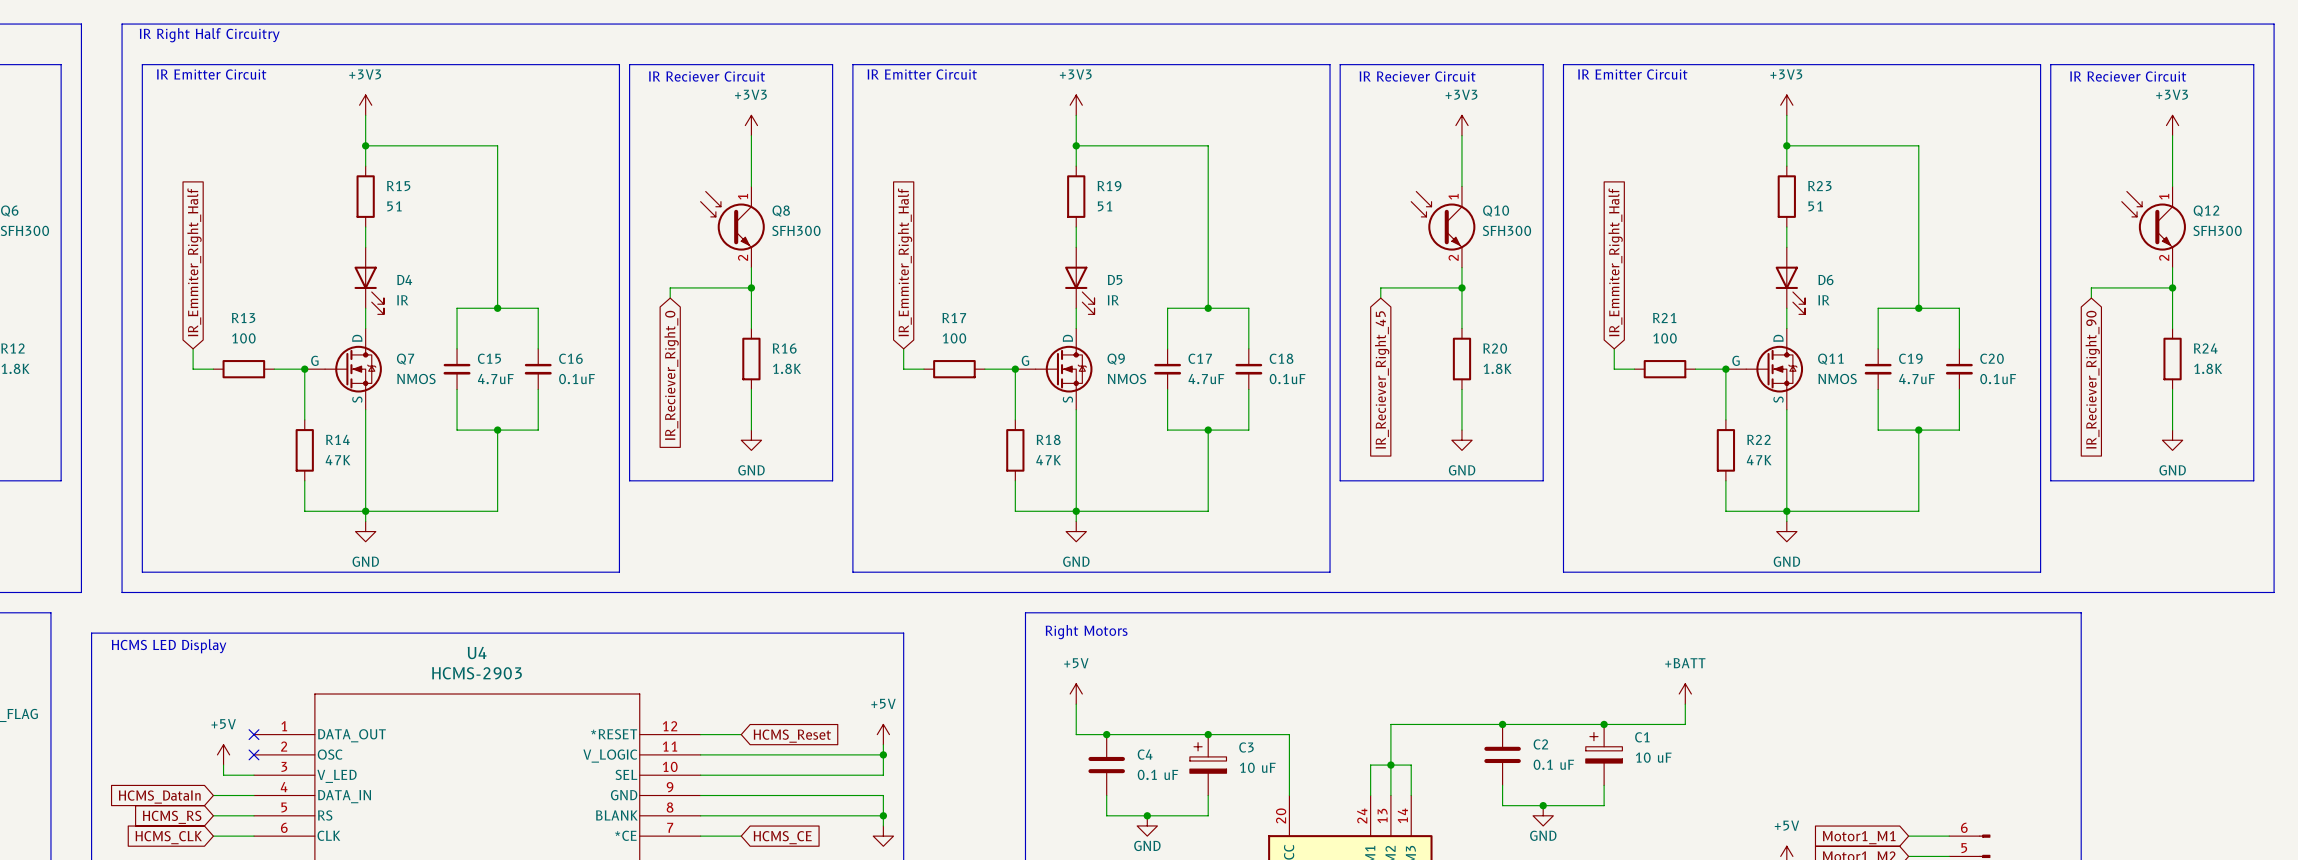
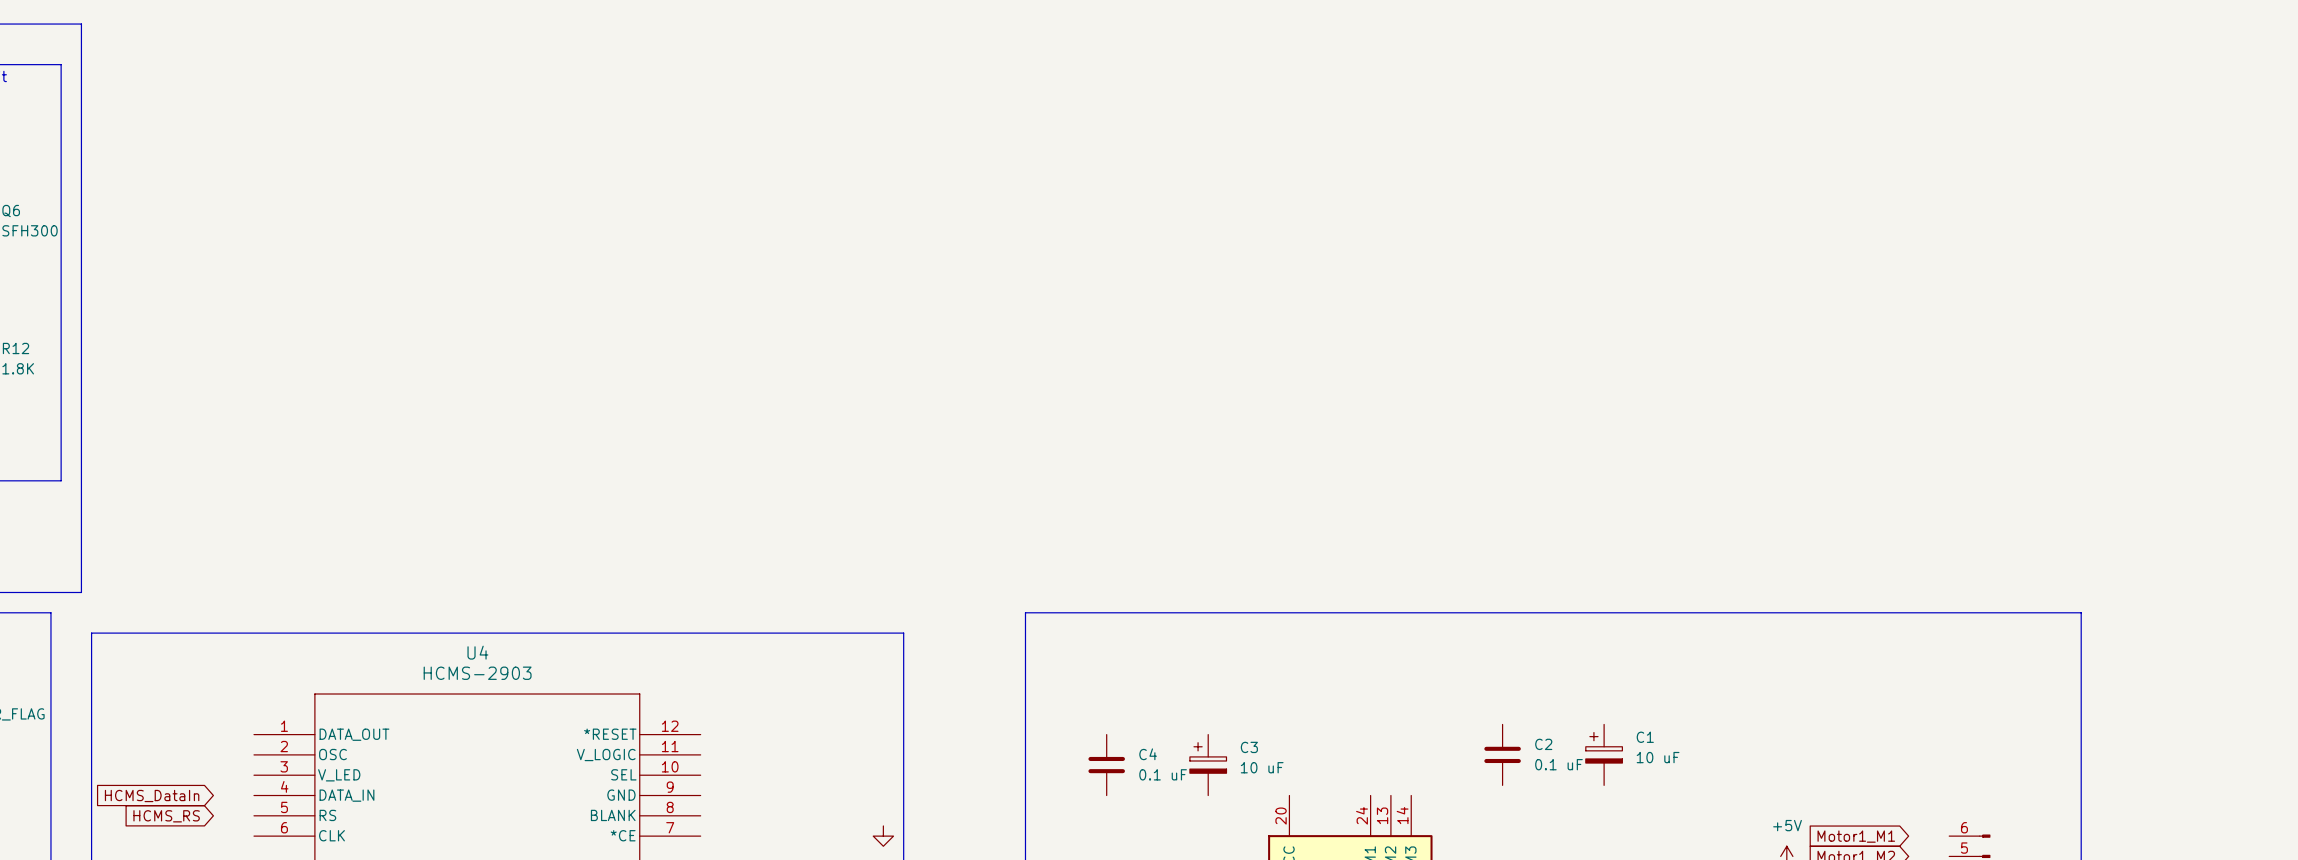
line: (122, 24) (2274, 24) (2274, 592) (122, 592) (122, 24) -> none
text: IR Right Half Circuitry (209, 35) -> none
line: (142, 64) (619, 64) (619, 572) (142, 572) (142, 64) -> none
line: (629, 64) (832, 64) (832, 480) (629, 480) (629, 64) -> none
line: (852, 64) (1330, 64) (1330, 572) (852, 572) (852, 64) -> none
line: (1340, 64) (1543, 64) (1543, 480) (1340, 480) (1340, 64) -> none
line: (1563, 64) (2040, 64) (2040, 572) (1563, 572) (1563, 64) -> none
line: (2050, 64) (2253, 64) (2253, 480) (2050, 480) (2050, 64) -> none
text: IR Emitter Circuit (211, 74) -> none
text: IR Emitter Circuit (922, 74) -> none
text: IR Emitter Circuit (1632, 74) -> none
text: IR Reciever Circuit (707, 76) -> none
text: IR Reciever Circuit (1417, 76) -> none
text: IR Reciever Circuit (2128, 76) -> none
power symbol: +3V3 (365, 105) -> none
power symbol: +3V3 (1076, 105) -> none
power symbol: +3V3 (1786, 105) -> none
wire: (365, 115) (365, 166) -> none
wire: (1076, 115) (1076, 166) -> none
wire: (1786, 115) (1786, 166) -> none
power symbol: +3V3 (751, 125) -> none
power symbol: +3V3 (1461, 125) -> none
power symbol: +3V3 (2172, 125) -> none
wire: (751, 135) (751, 186) -> none
wire: (1461, 135) (1461, 186) -> none
wire: (2172, 135) (2172, 186) -> none
wire: (365, 145) (497, 145) (497, 308) -> none
junction: (365, 145) -> none
wire: (1076, 145) (1208, 145) (1208, 308) -> none
junction: (1076, 145) -> none
wire: (1786, 145) (1918, 145) (1918, 308) -> none
junction: (1786, 145) -> none
R15: 51 (365, 196) -> none
R19: 51 (1076, 196) -> none
R23: 51 (1786, 196) -> none
wire: (365, 227) (365, 247) -> none
Q8: SFH300 (732, 227) -> none
wire: (1076, 227) (1076, 247) -> none
Q10: SFH300 (1443, 227) -> none
wire: (1786, 227) (1786, 247) -> none
Q12: SFH300 (2153, 227) -> none
global label: IR_Emmiter_Right_Half (194, 262) -> none
global label: IR_Emmiter_Right_Half (905, 262) -> none
global label: IR_Emmiter_Right_Half (1615, 262) -> none
wire: (751, 267) (751, 328) -> none
wire: (1461, 267) (1461, 328) -> none
wire: (2172, 267) (2172, 328) -> none
D4: IR (369, 280) -> none
D5: IR (1079, 280) -> none
D6: IR (1790, 280) -> none
wire: (751, 287) (670, 287) (670, 298) -> none
junction: (751, 287) -> none
wire: (1461, 287) (1380, 287) (1380, 298) -> none
junction: (1461, 287) -> none
wire: (2172, 287) (2091, 287) (2091, 298) -> none
junction: (2172, 287) -> none
wire: (365, 308) (365, 328) -> none
junction: (497, 308) -> none
wire: (1076, 308) (1076, 328) -> none
junction: (1208, 308) -> none
wire: (1786, 308) (1786, 328) -> none
junction: (1918, 308) -> none
wire: (193, 348) (193, 369) (213, 369) -> none
wire: (457, 348) (457, 308) (538, 308) (538, 348) -> none
wire: (903, 348) (903, 369) (923, 369) -> none
wire: (1167, 348) (1167, 308) (1248, 308) (1248, 348) -> none
wire: (1614, 348) (1614, 369) (1634, 369) -> none
wire: (1878, 348) (1878, 308) (1959, 308) (1959, 348) -> none
R16: 1.8K (751, 359) -> none
R20: 1.8K (1461, 359) -> none
R24: 1.8K (2172, 359) -> none
R13: 100 (243, 369) -> none
wire: (274, 369) (304, 369) (304, 419) -> none
junction: (304, 369) -> none
Q7: NMOS (343, 369) -> none
C15: 4.7uF (457, 369) -> none
C16: 0.1uF (538, 369) -> none
R17: 100 (954, 369) -> none
wire: (984, 369) (1015, 369) (1015, 419) -> none
junction: (1015, 369) -> none
Q9: NMOS (1053, 369) -> none
C17: 4.7uF (1167, 369) -> none
C18: 0.1uF (1248, 369) -> none
R21: 100 (1665, 369) -> none
wire: (1695, 369) (1725, 369) (1725, 419) -> none
junction: (1725, 369) -> none
Q11: NMOS (1764, 369) -> none
C19: 4.7uF (1878, 369) -> none
C20: 0.1uF (1959, 369) -> none
global label: IR_Reciever_Right_0 (671, 375) -> none
global label: IR_Reciever_Right_45 (1382, 379) -> none
global label: IR_Reciever_Right_90 (2092, 379) -> none
wire: (457, 389) (457, 430) (538, 430) (538, 389) -> none
wire: (751, 389) (751, 430) -> none
wire: (1167, 389) (1167, 430) (1248, 430) (1248, 389) -> none
wire: (1461, 389) (1461, 430) -> none
wire: (1878, 389) (1878, 430) (1959, 430) (1959, 389) -> none
wire: (2172, 389) (2172, 430) -> none
wire: (365, 409) (365, 521) -> none
wire: (1076, 409) (1076, 521) -> none
wire: (1786, 409) (1786, 521) -> none
wire: (497, 430) (497, 511) (304, 511) (304, 480) -> none
junction: (497, 430) -> none
wire: (1208, 430) (1208, 511) (1015, 511) (1015, 480) -> none
junction: (1208, 430) -> none
wire: (1918, 430) (1918, 511) (1725, 511) (1725, 480) -> none
junction: (1918, 430) -> none
power symbol: GND (751, 440) -> none
power symbol: GND (1461, 440) -> none
power symbol: GND (2172, 440) -> none
R14: 47K (304, 450) -> none
R18: 47K (1015, 450) -> none
R22: 47K (1725, 450) -> none
junction: (365, 511) -> none
junction: (1076, 511) -> none
junction: (1786, 511) -> none
power symbol: GND (365, 531) -> none
power symbol: GND (1076, 531) -> none
power symbol: GND (1786, 531) -> none
text: Right Motors (1086, 632) -> none
text: HCMS LED Display (169, 646) -> none
power symbol: +5V (1076, 694) -> none
power symbol: +BATT (1685, 694) -> none
wire: (1076, 704) (1076, 734) (1289, 734) (1289, 795) -> none
wire: (1685, 704) (1685, 724) (1390, 724) (1390, 795) -> none
junction: (1502, 724) -> none
junction: (1604, 724) -> none
no-connect mark: (254, 734) -> none
wire: (700, 734) (741, 734) -> none
power symbol: +5V (883, 734) -> none
junction: (1106, 734) -> none
junction: (1208, 734) -> none
global label: HCMS_Reset (792, 736) -> none
wire: (883, 744) (883, 775) (700, 775) -> none
power symbol: +5V (223, 754) -> none
no-connect mark: (254, 754) -> none
wire: (700, 754) (883, 754) -> none
junction: (883, 754) -> none
wire: (223, 765) (223, 775) (254, 775) -> none
junction: (1390, 765) -> none
wire: (1502, 785) (1502, 805) (1604, 805) (1604, 785) -> none
wire: (213, 795) (254, 795) -> none
wire: (700, 795) (883, 795) (883, 825) -> none
wire: (1106, 795) (1106, 815) (1208, 815) (1208, 795) -> none
wire: (1370, 795) (1370, 765) (1411, 765) (1411, 795) -> none
junction: (1543, 805) -> none
wire: (213, 815) (254, 815) -> none
wire: (700, 815) (883, 815) -> none
junction: (883, 815) -> none
junction: (1147, 815) -> none
power symbol: GND (1543, 815) -> none
power symbol: GND (1147, 825) -> none
wire: (213, 836) (254, 836) -> none
wire: (700, 836) (741, 836) -> none
wire: (1908, 836) (1949, 836) -> none
global label: HCMS_CLK (168, 837) -> none
global label: HCMS_CE (782, 837) -> none
wire: (1908, 856) (1949, 856) -> none

